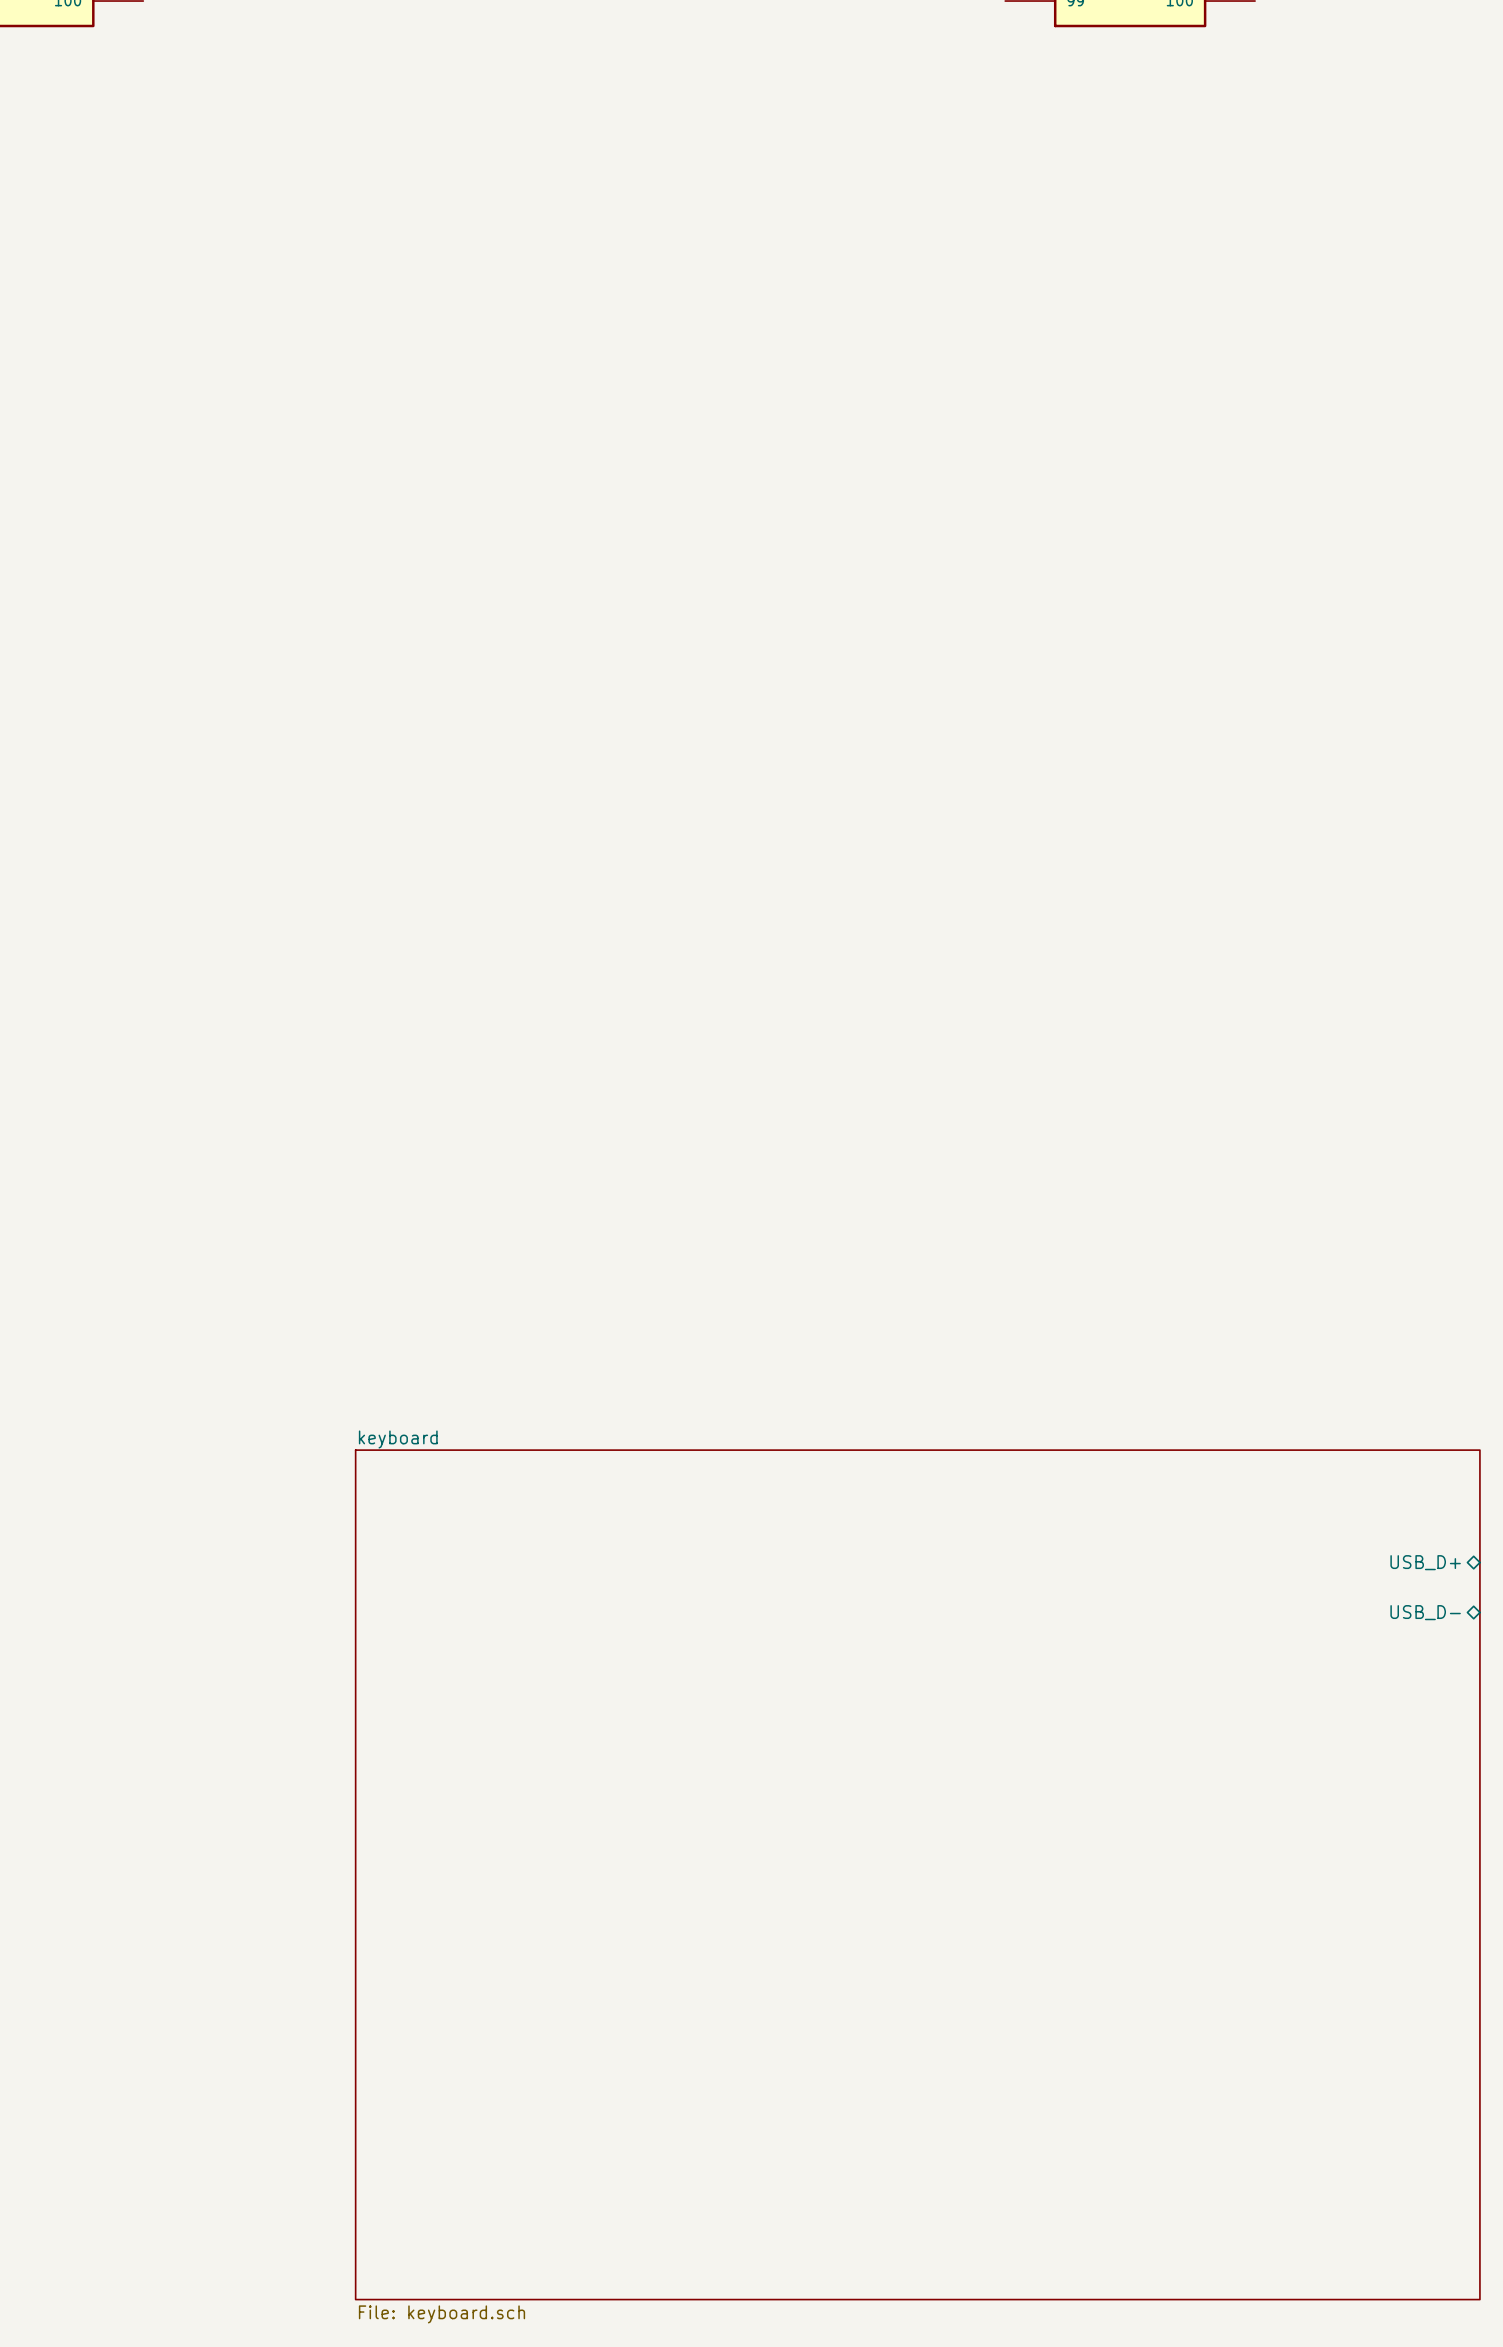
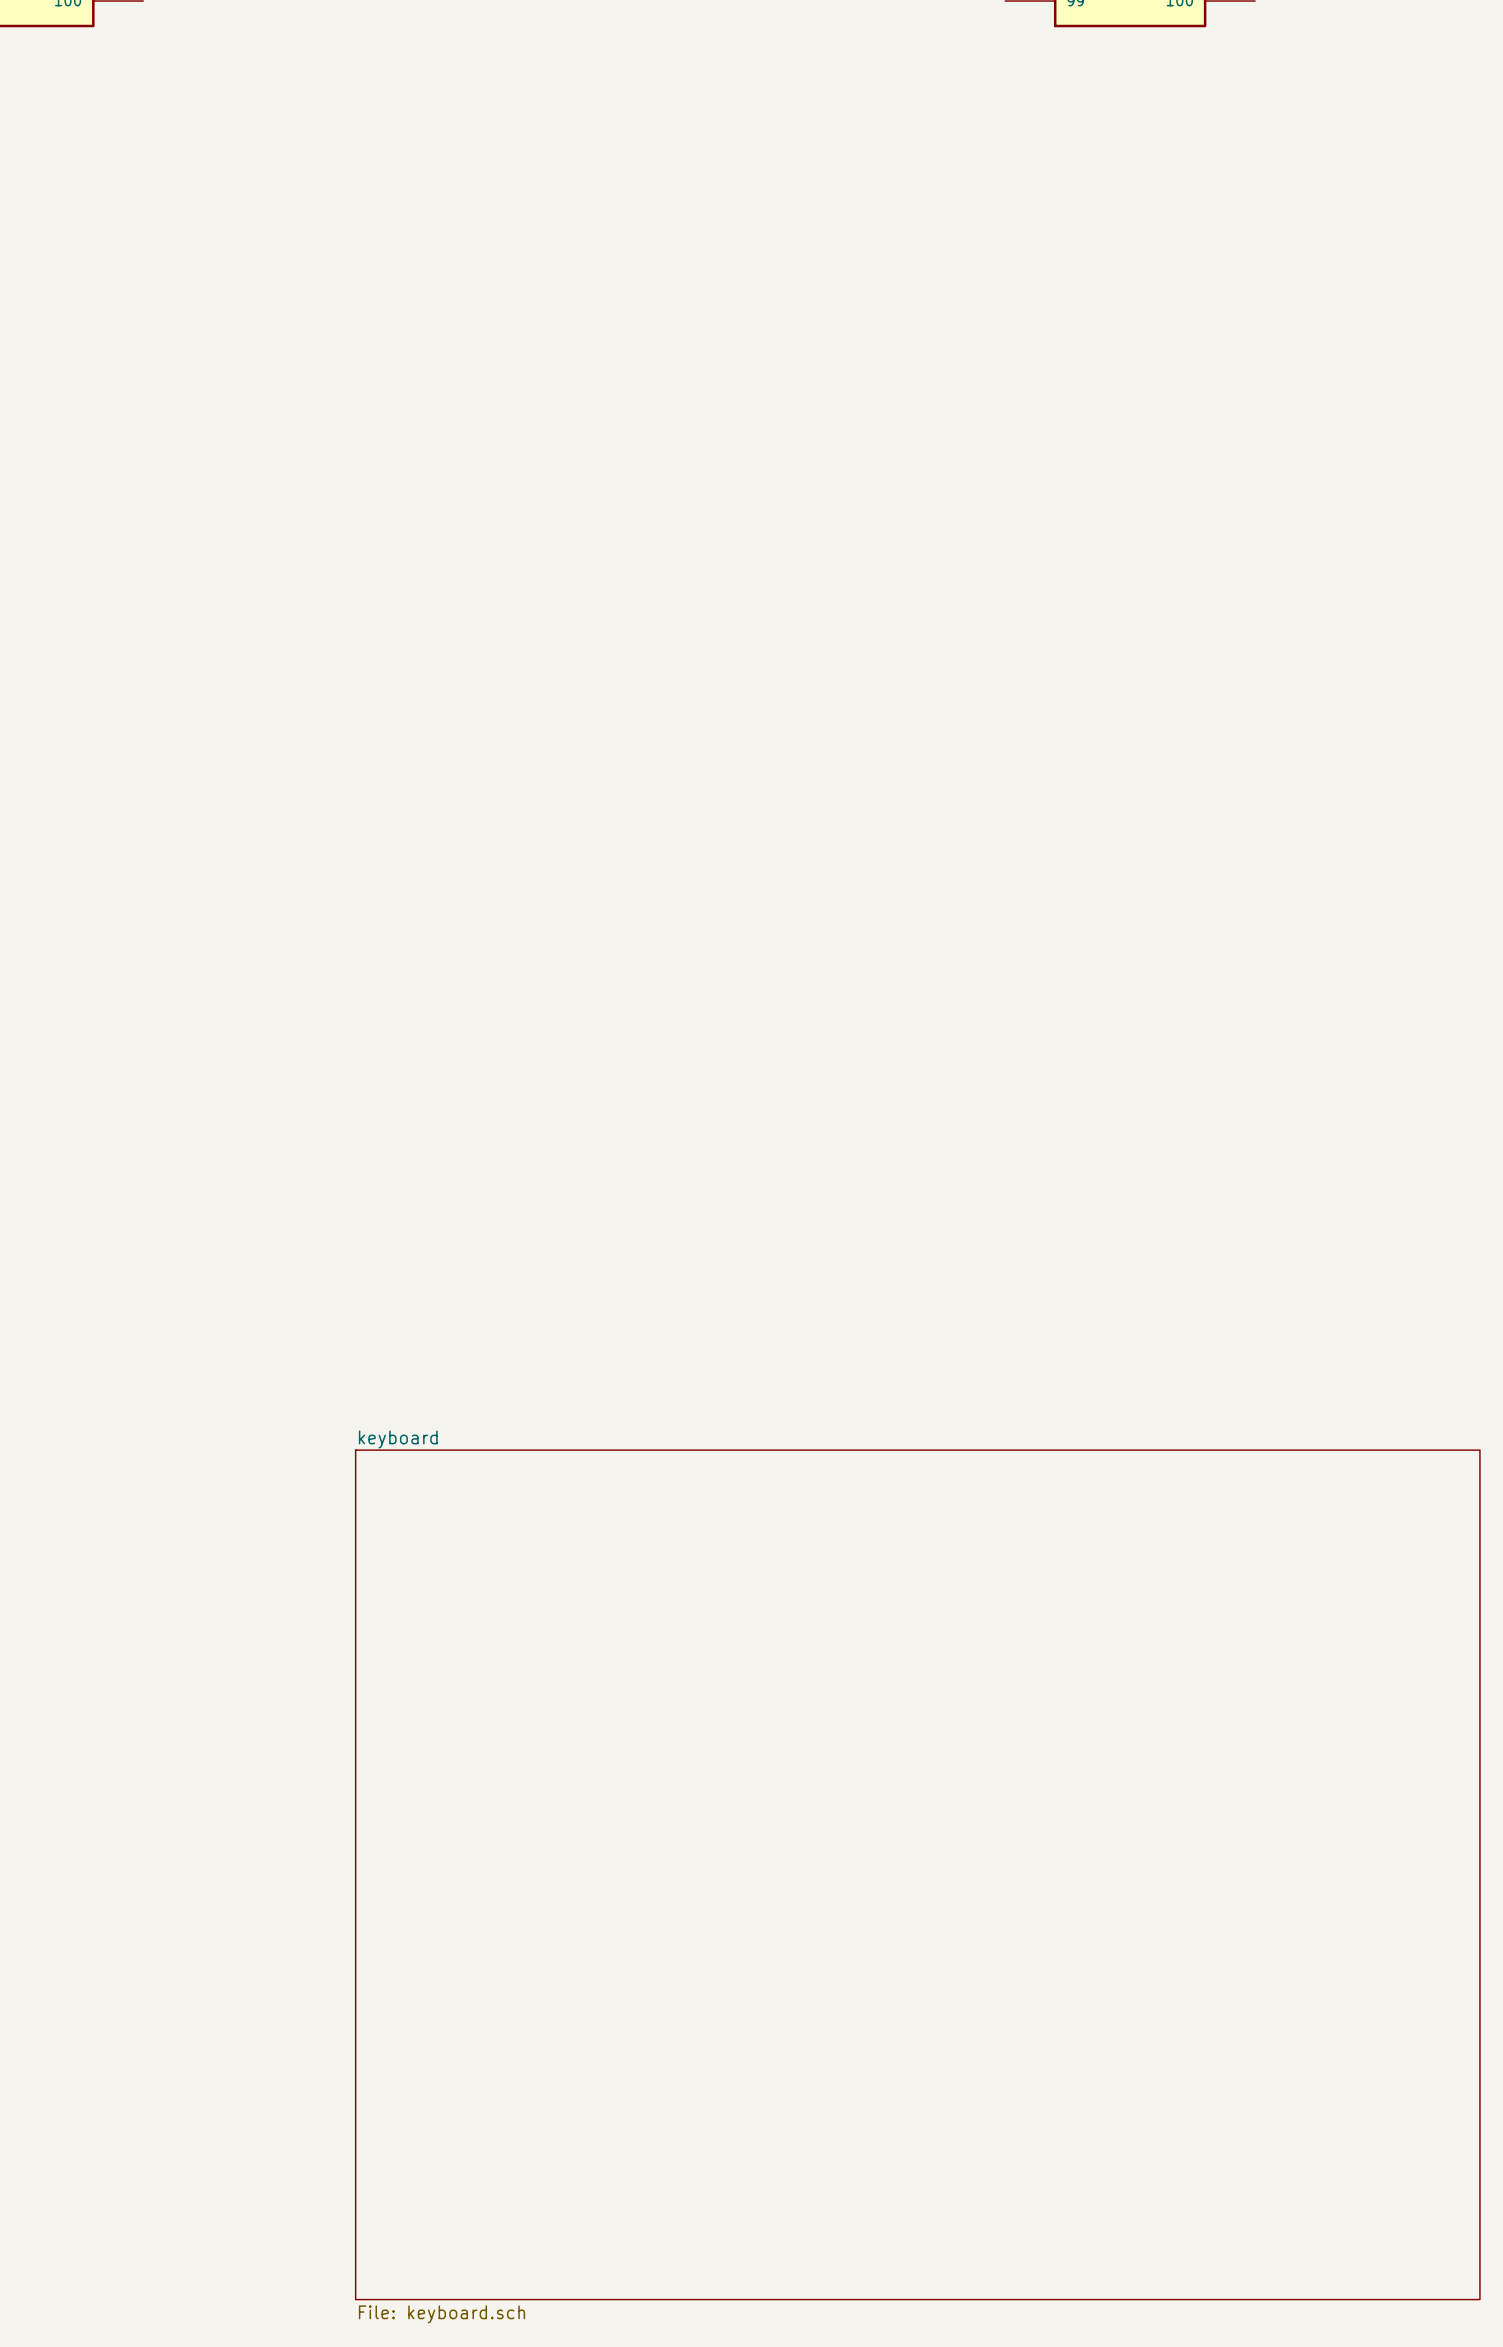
sheet pin: USB_D+ (1425, 1562) -> none
sheet pin: USB_D- (1425, 1612) -> none

